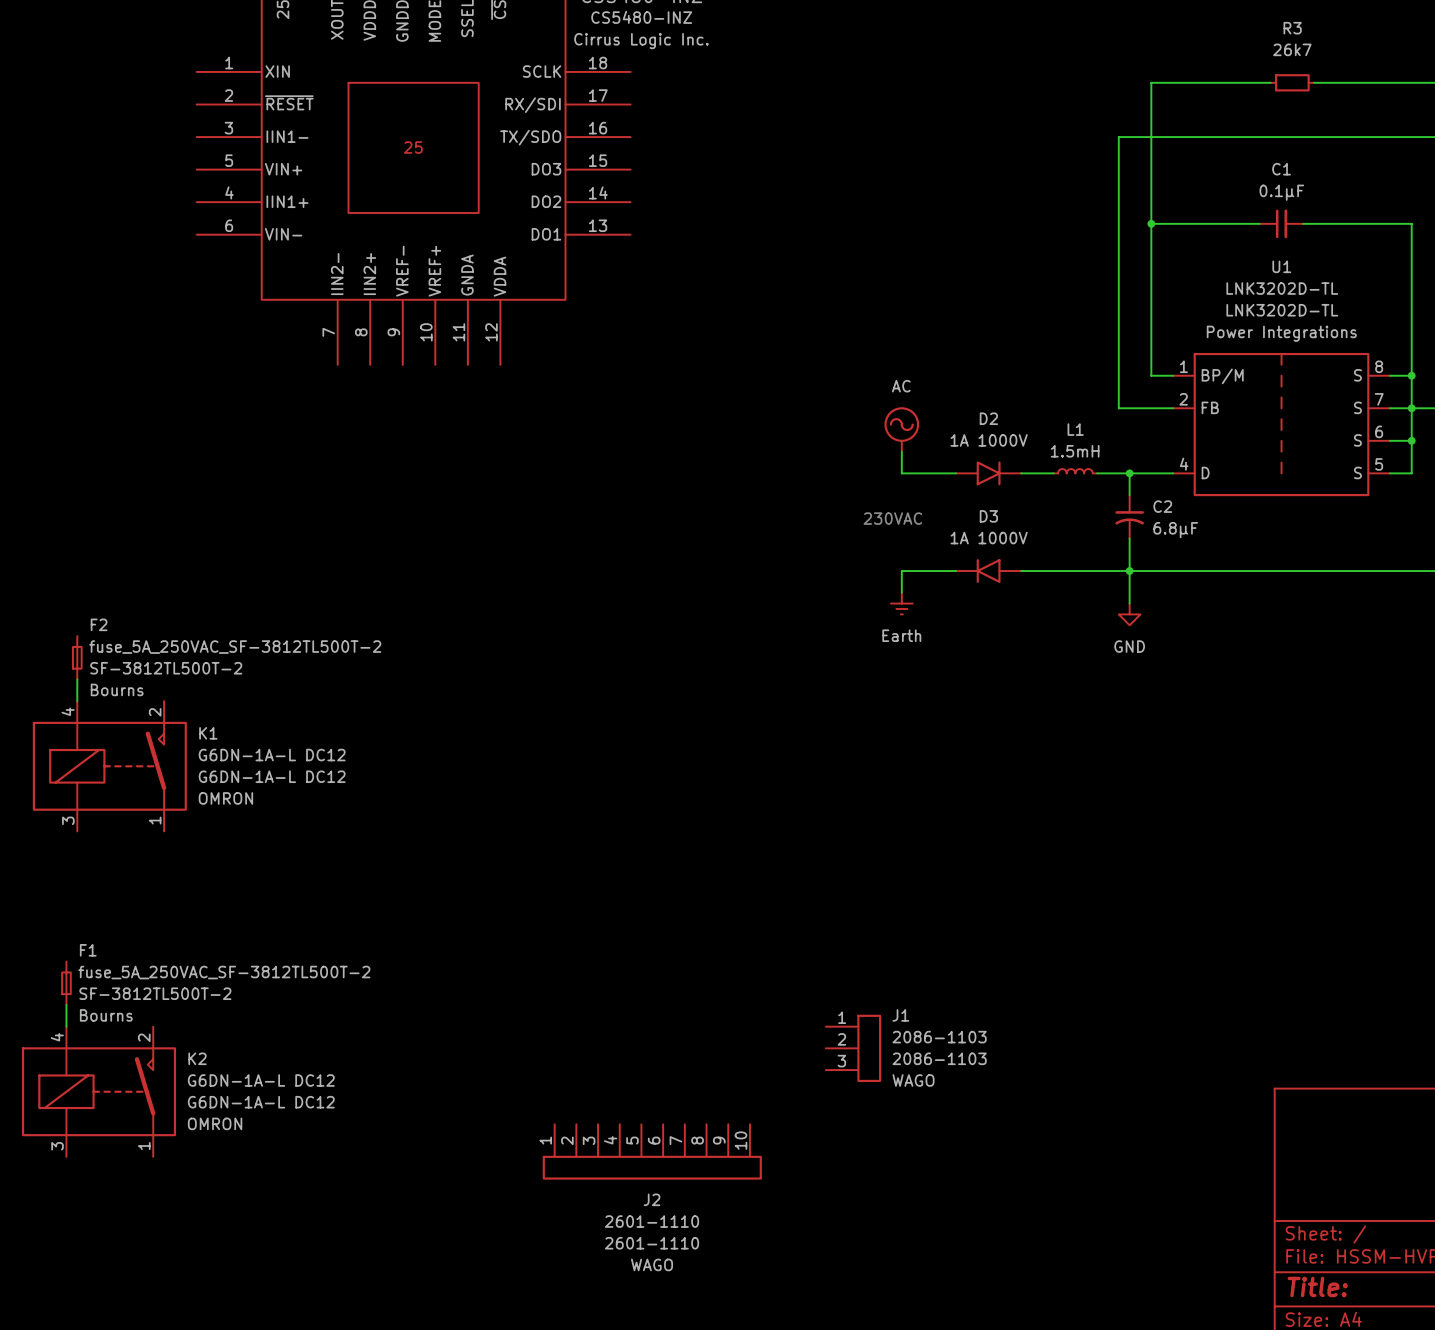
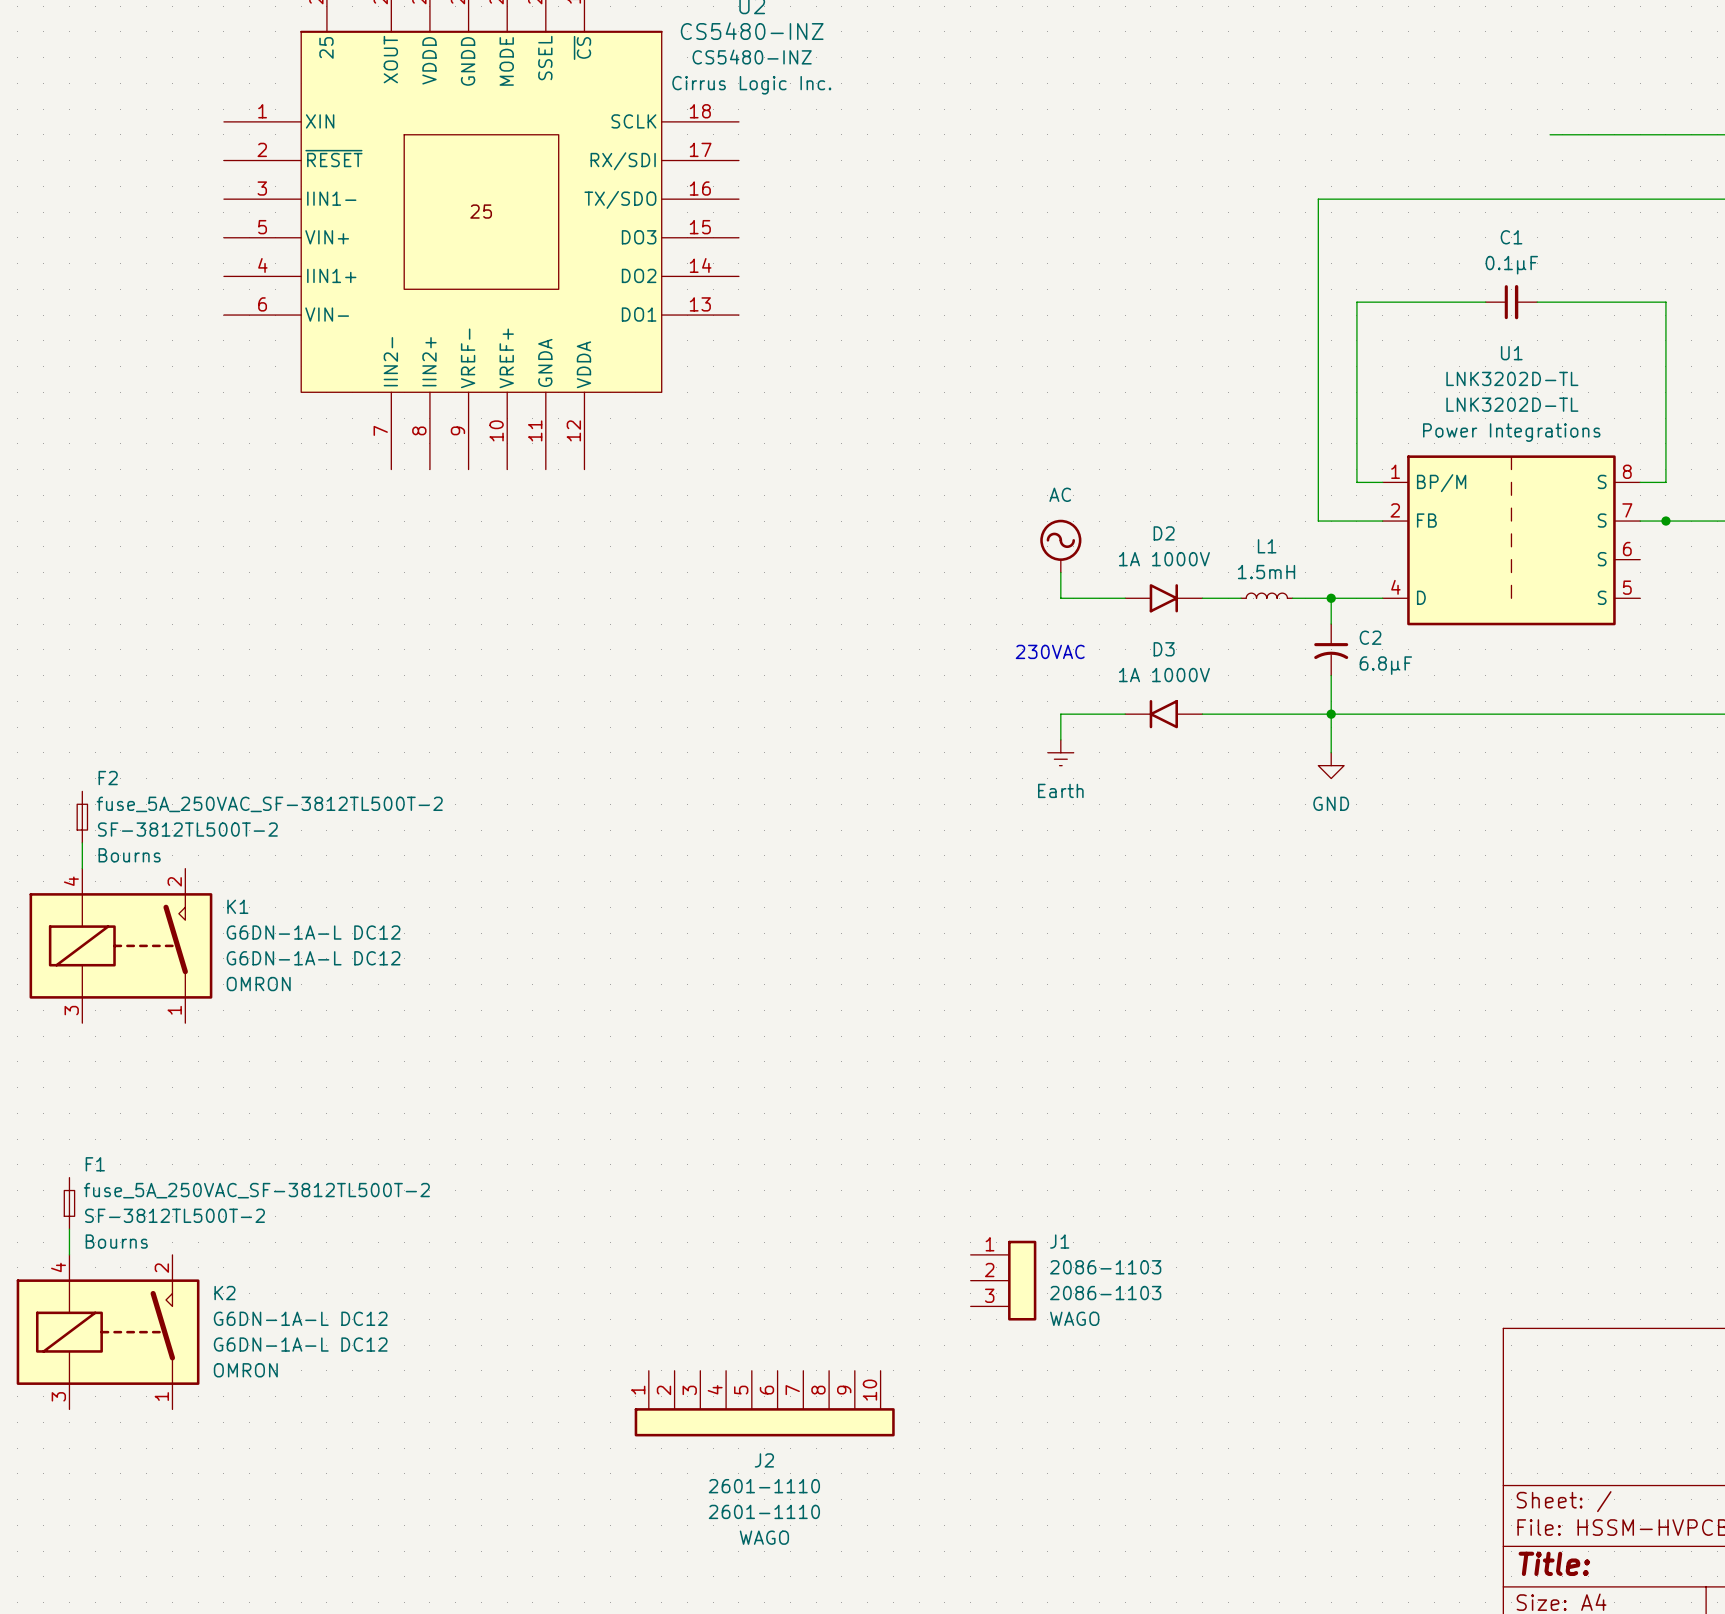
wire: (1270, 82) (1151, 82) (1151, 223) -> none
R3: (1292, 82) -> none
junction: (1151, 223) -> none
wire: (1411, 375) (1411, 473) (1390, 473) -> none
junction: (1411, 375) -> none
wire: (1390, 440) (1411, 440) -> none
junction: (1411, 440) -> none

